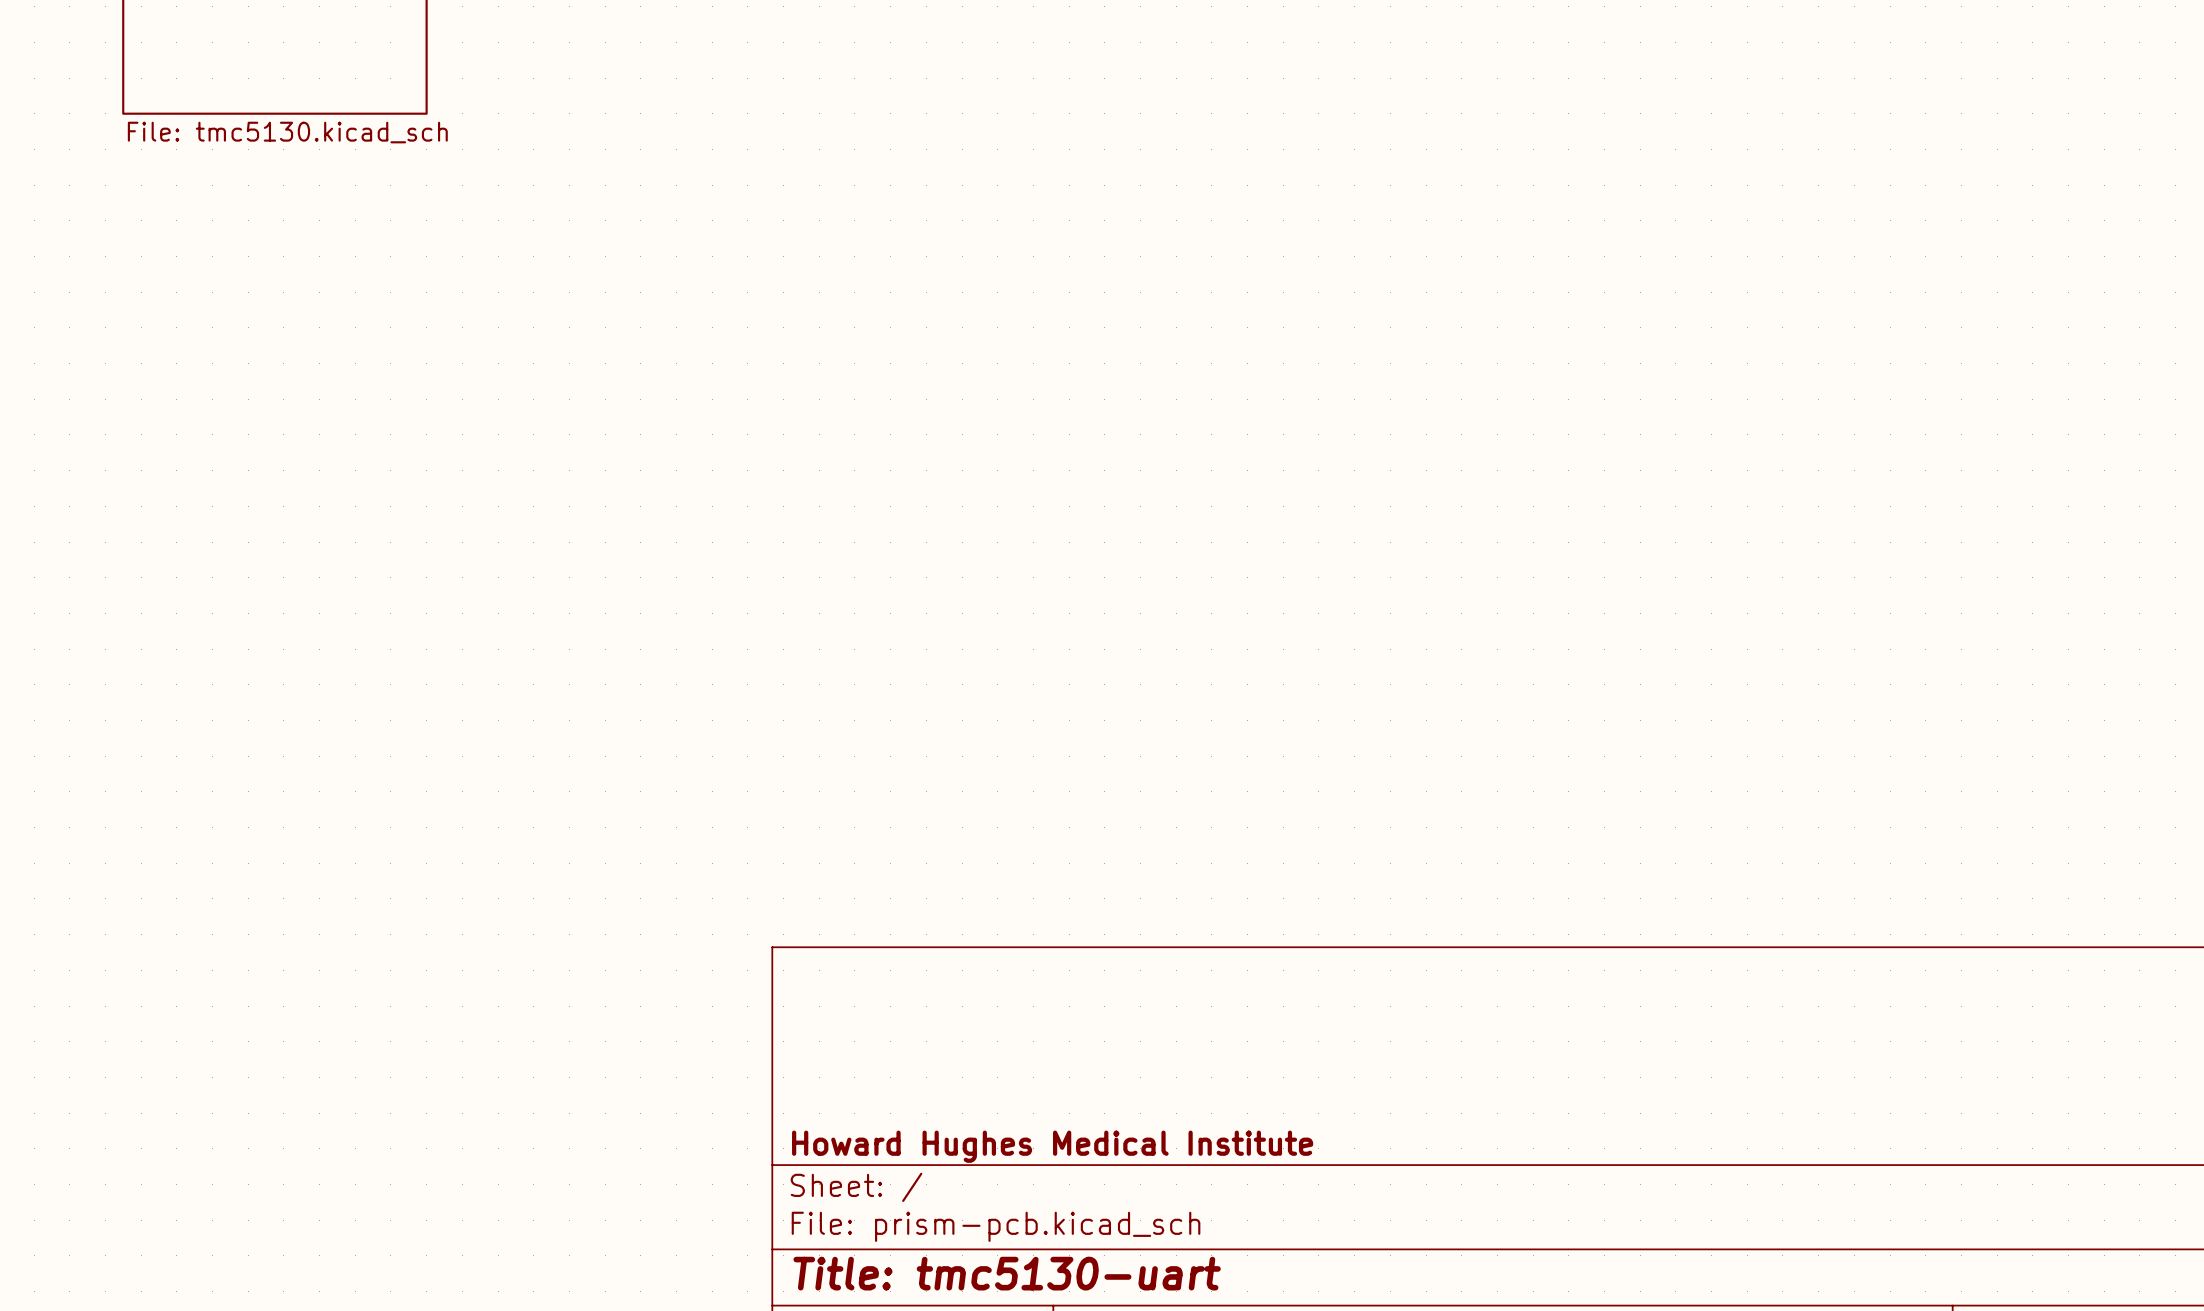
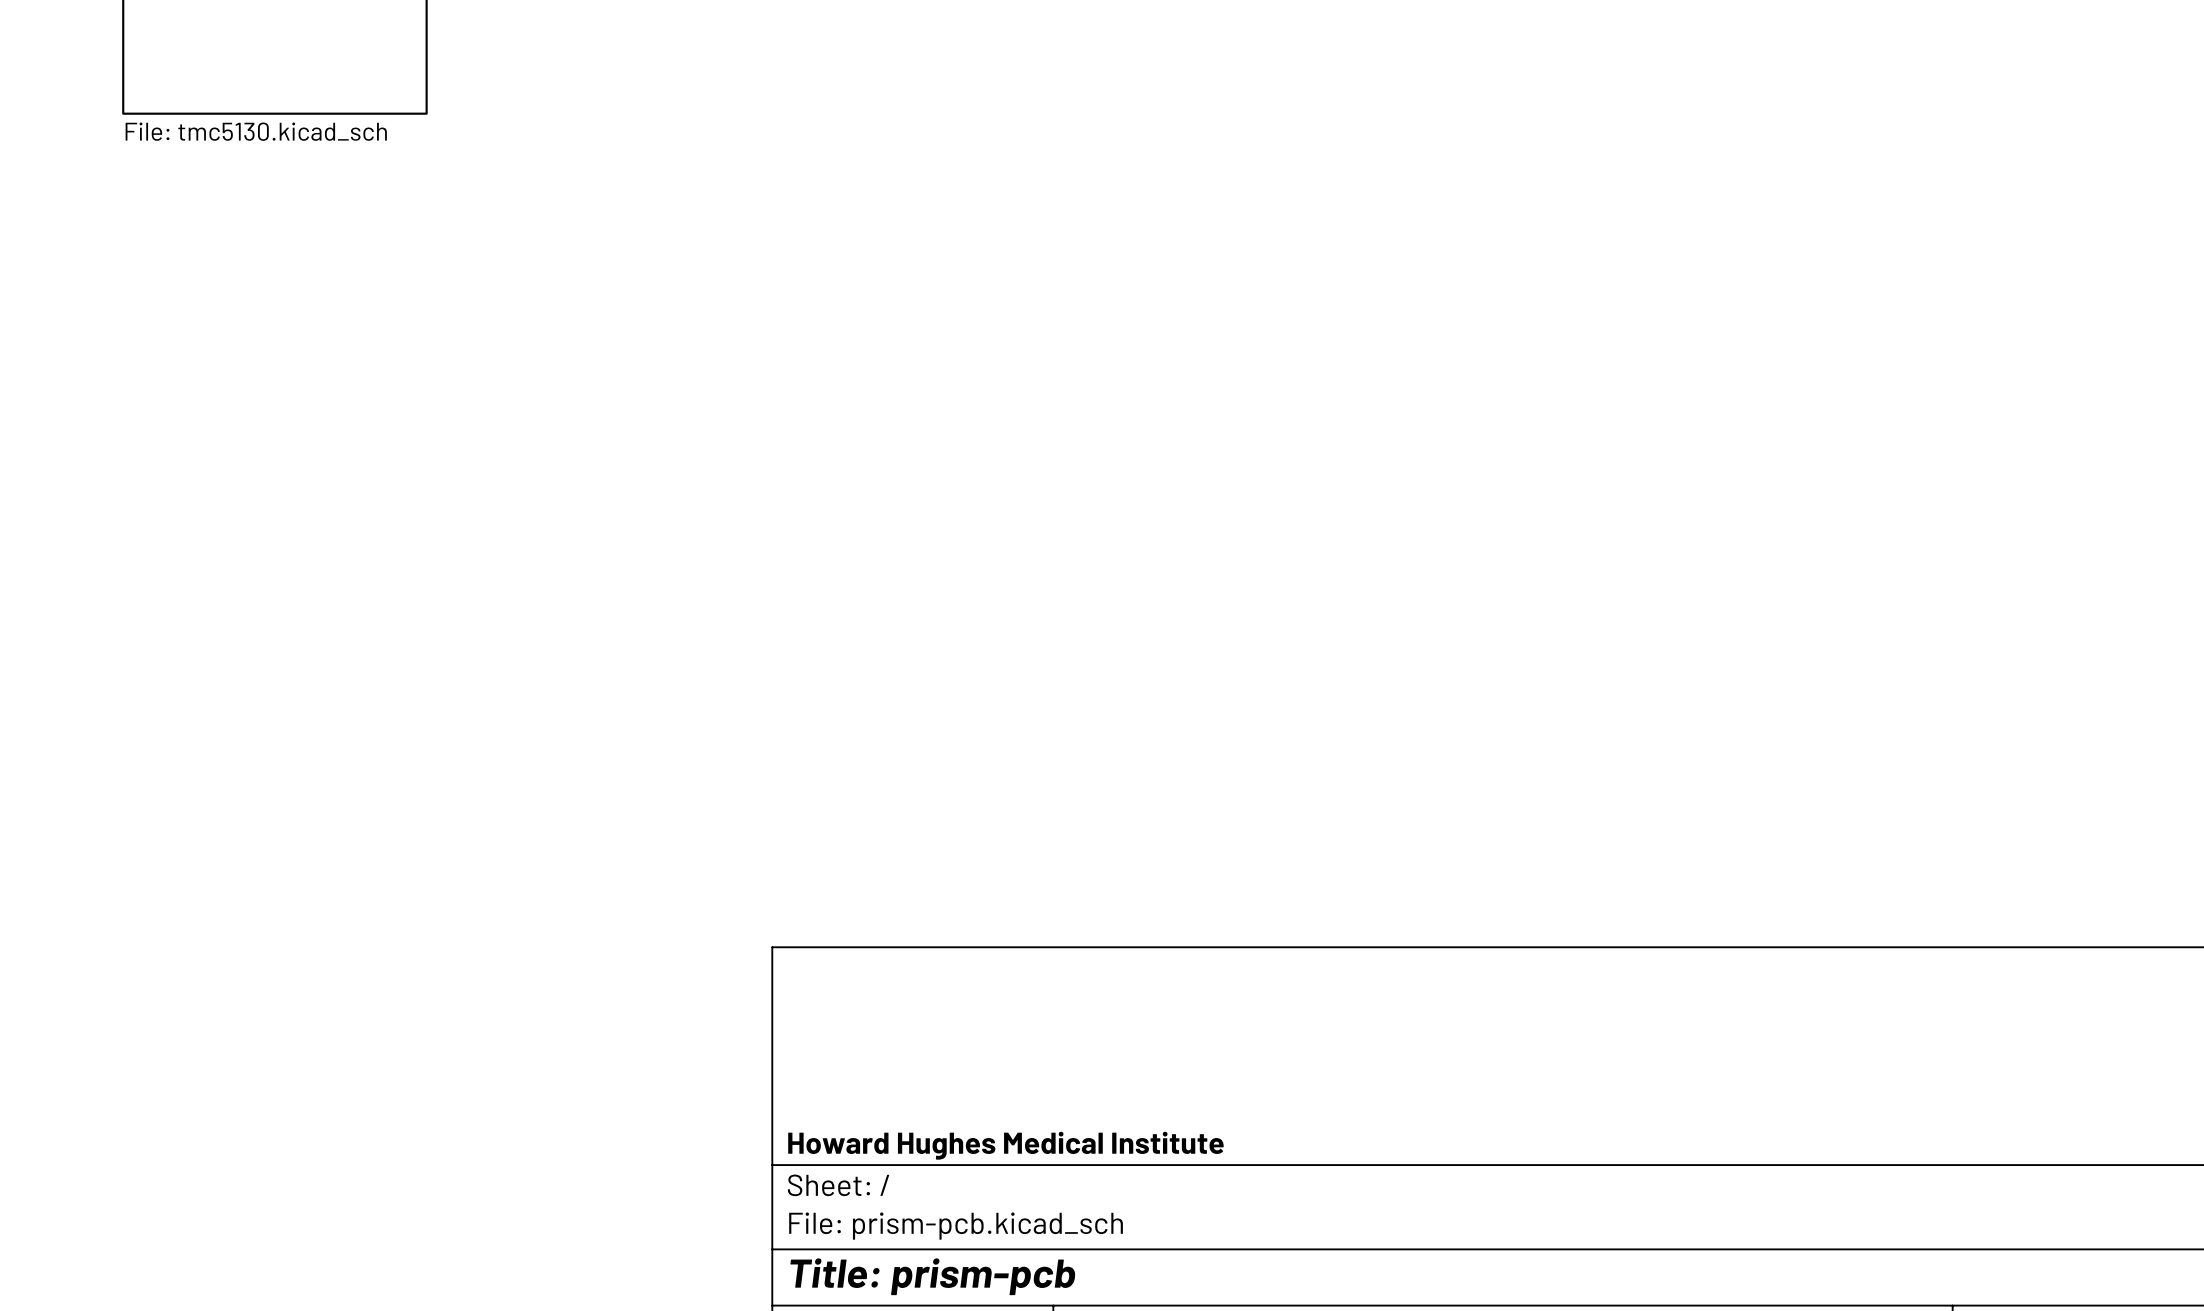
title block: Title: tmc5130-uart (1007, 1273) -> Title: prism-pcb (932, 1276)

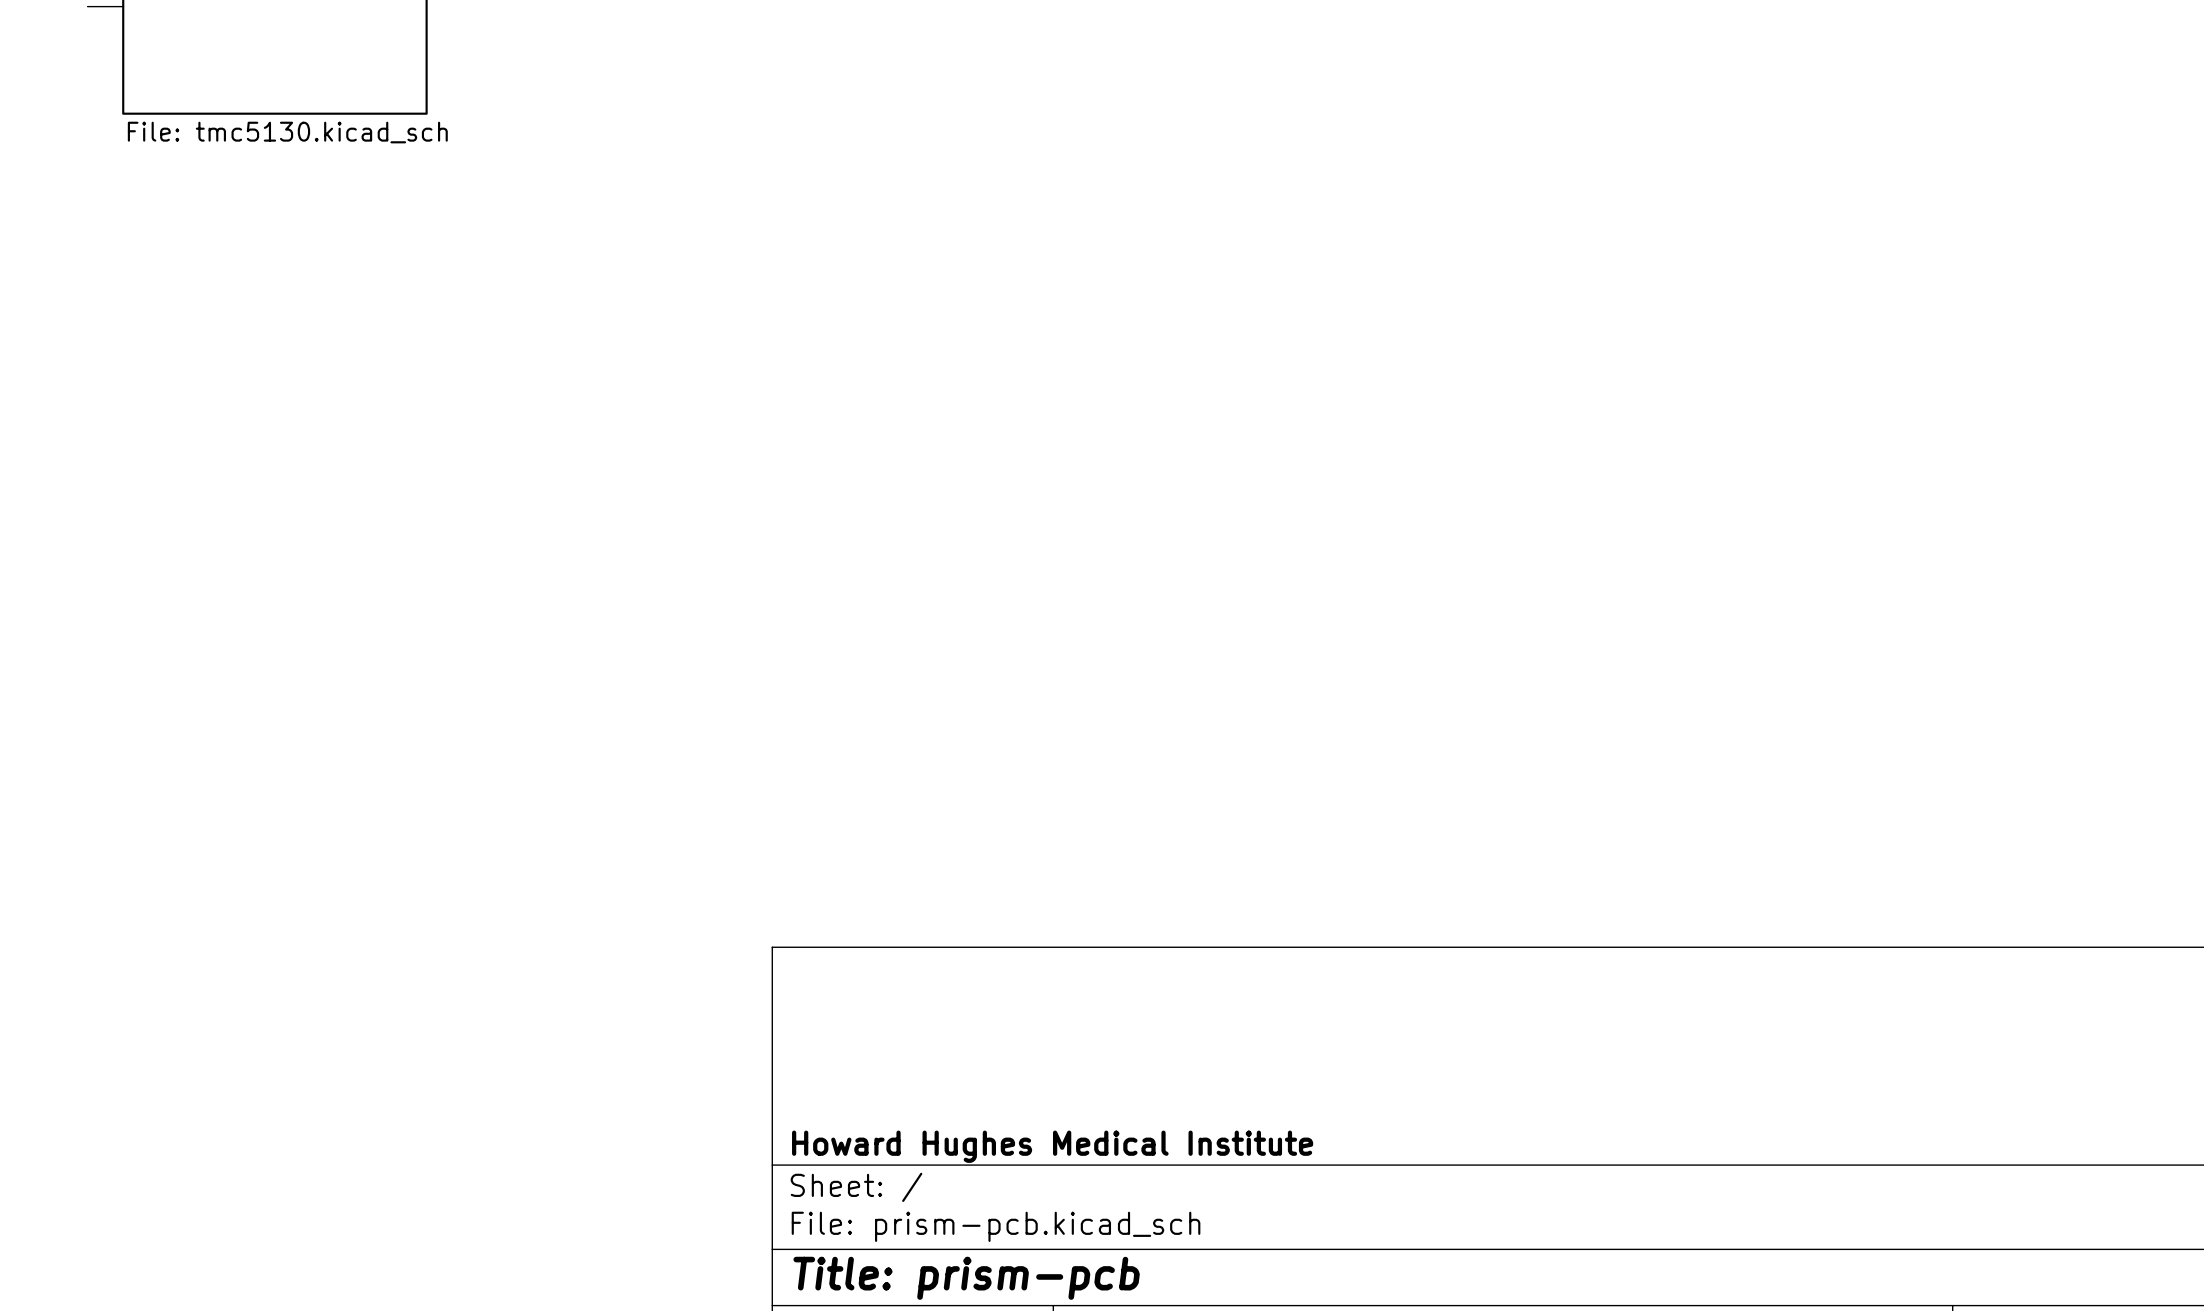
wire: none -> (87, 6) (123, 6)

